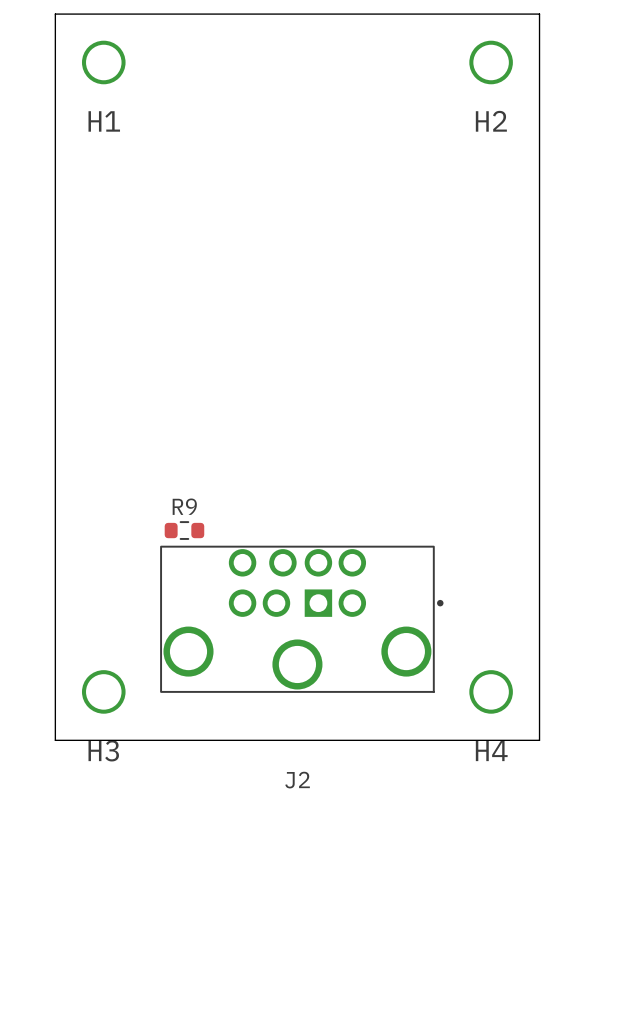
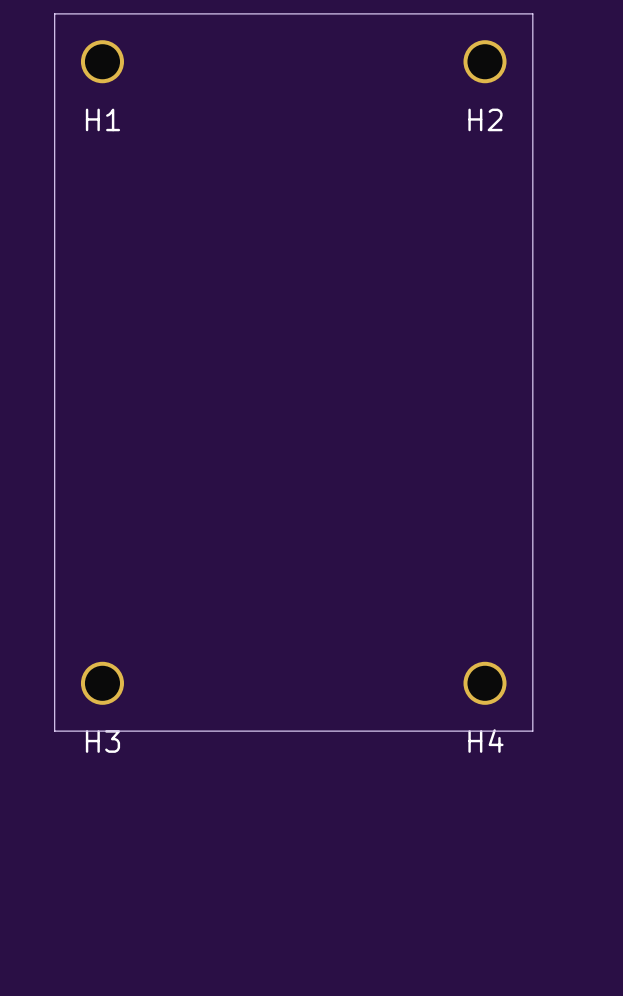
R9: (184, 530) -> none
J2: (301, 619) -> none

